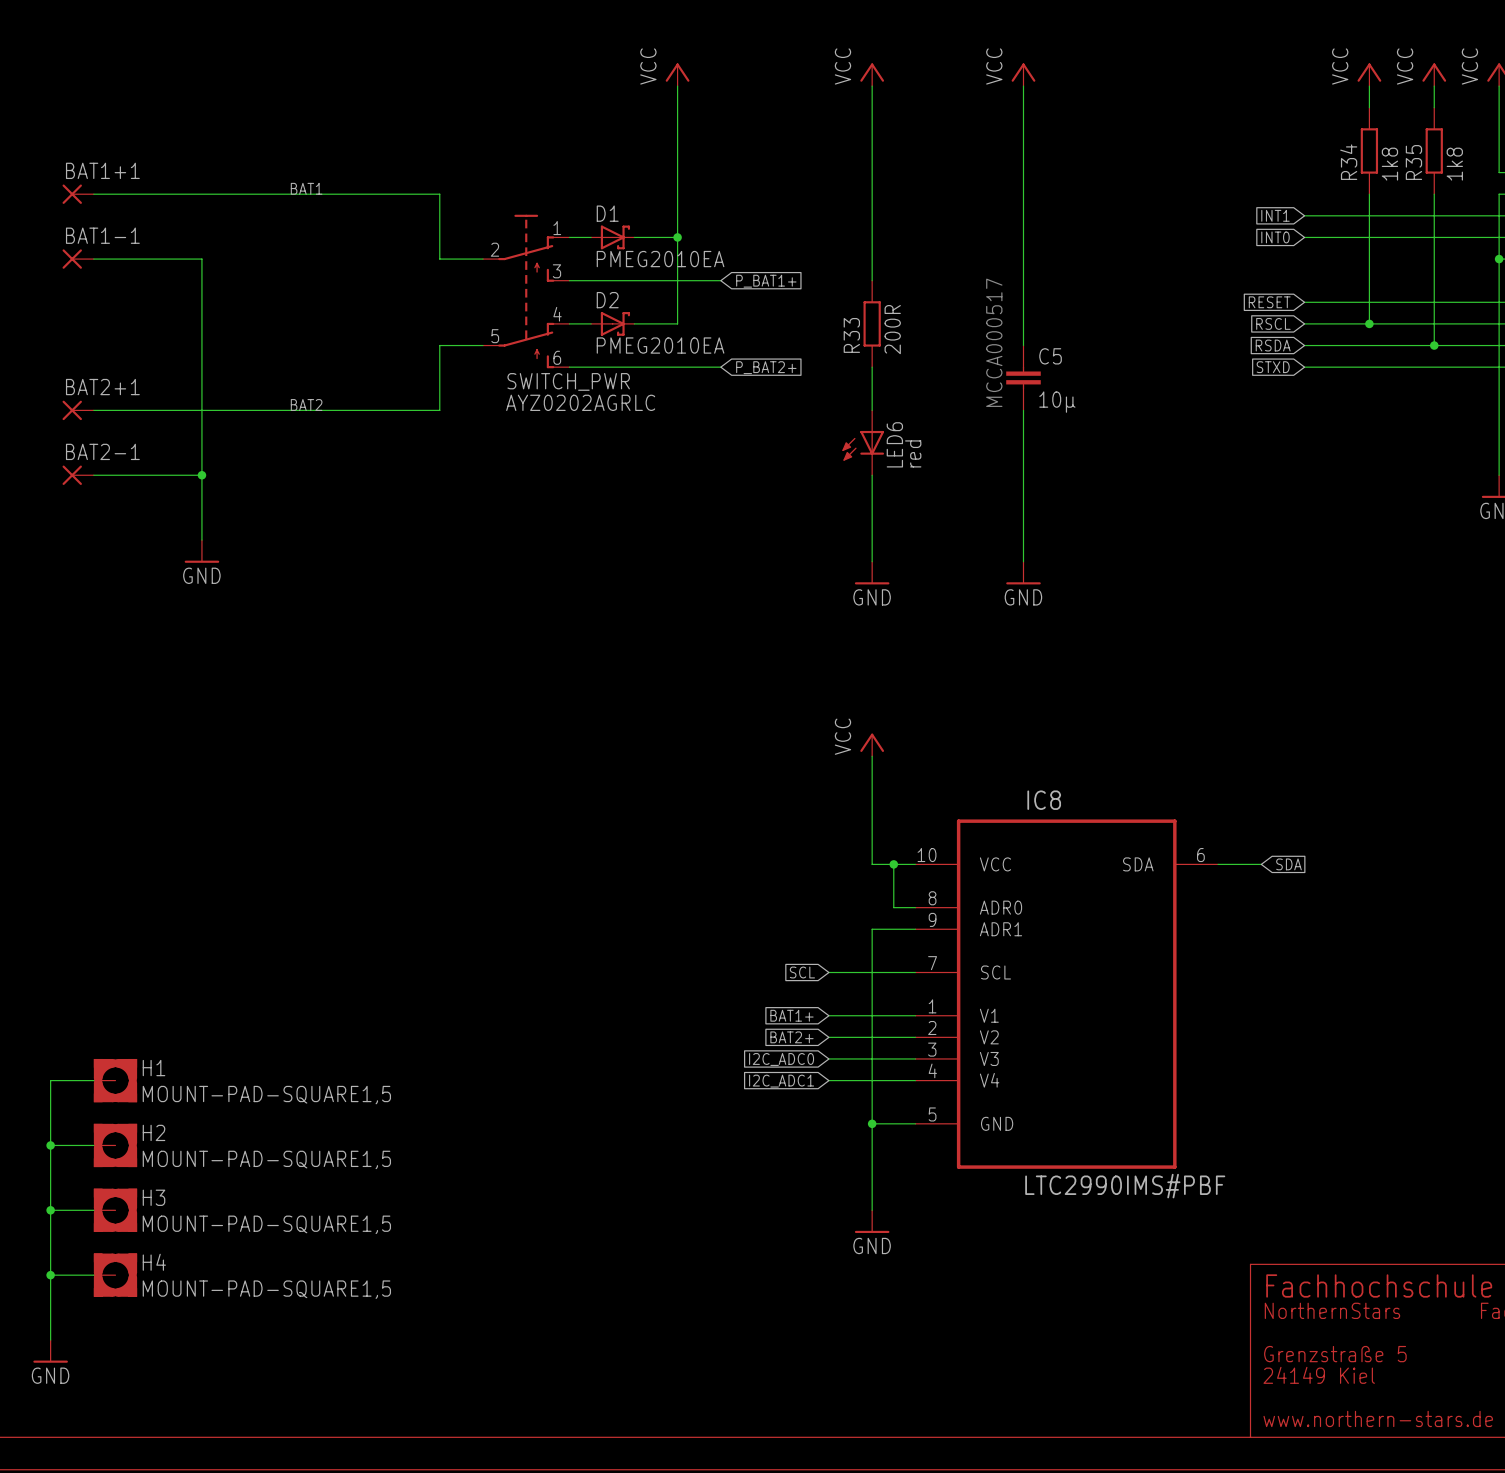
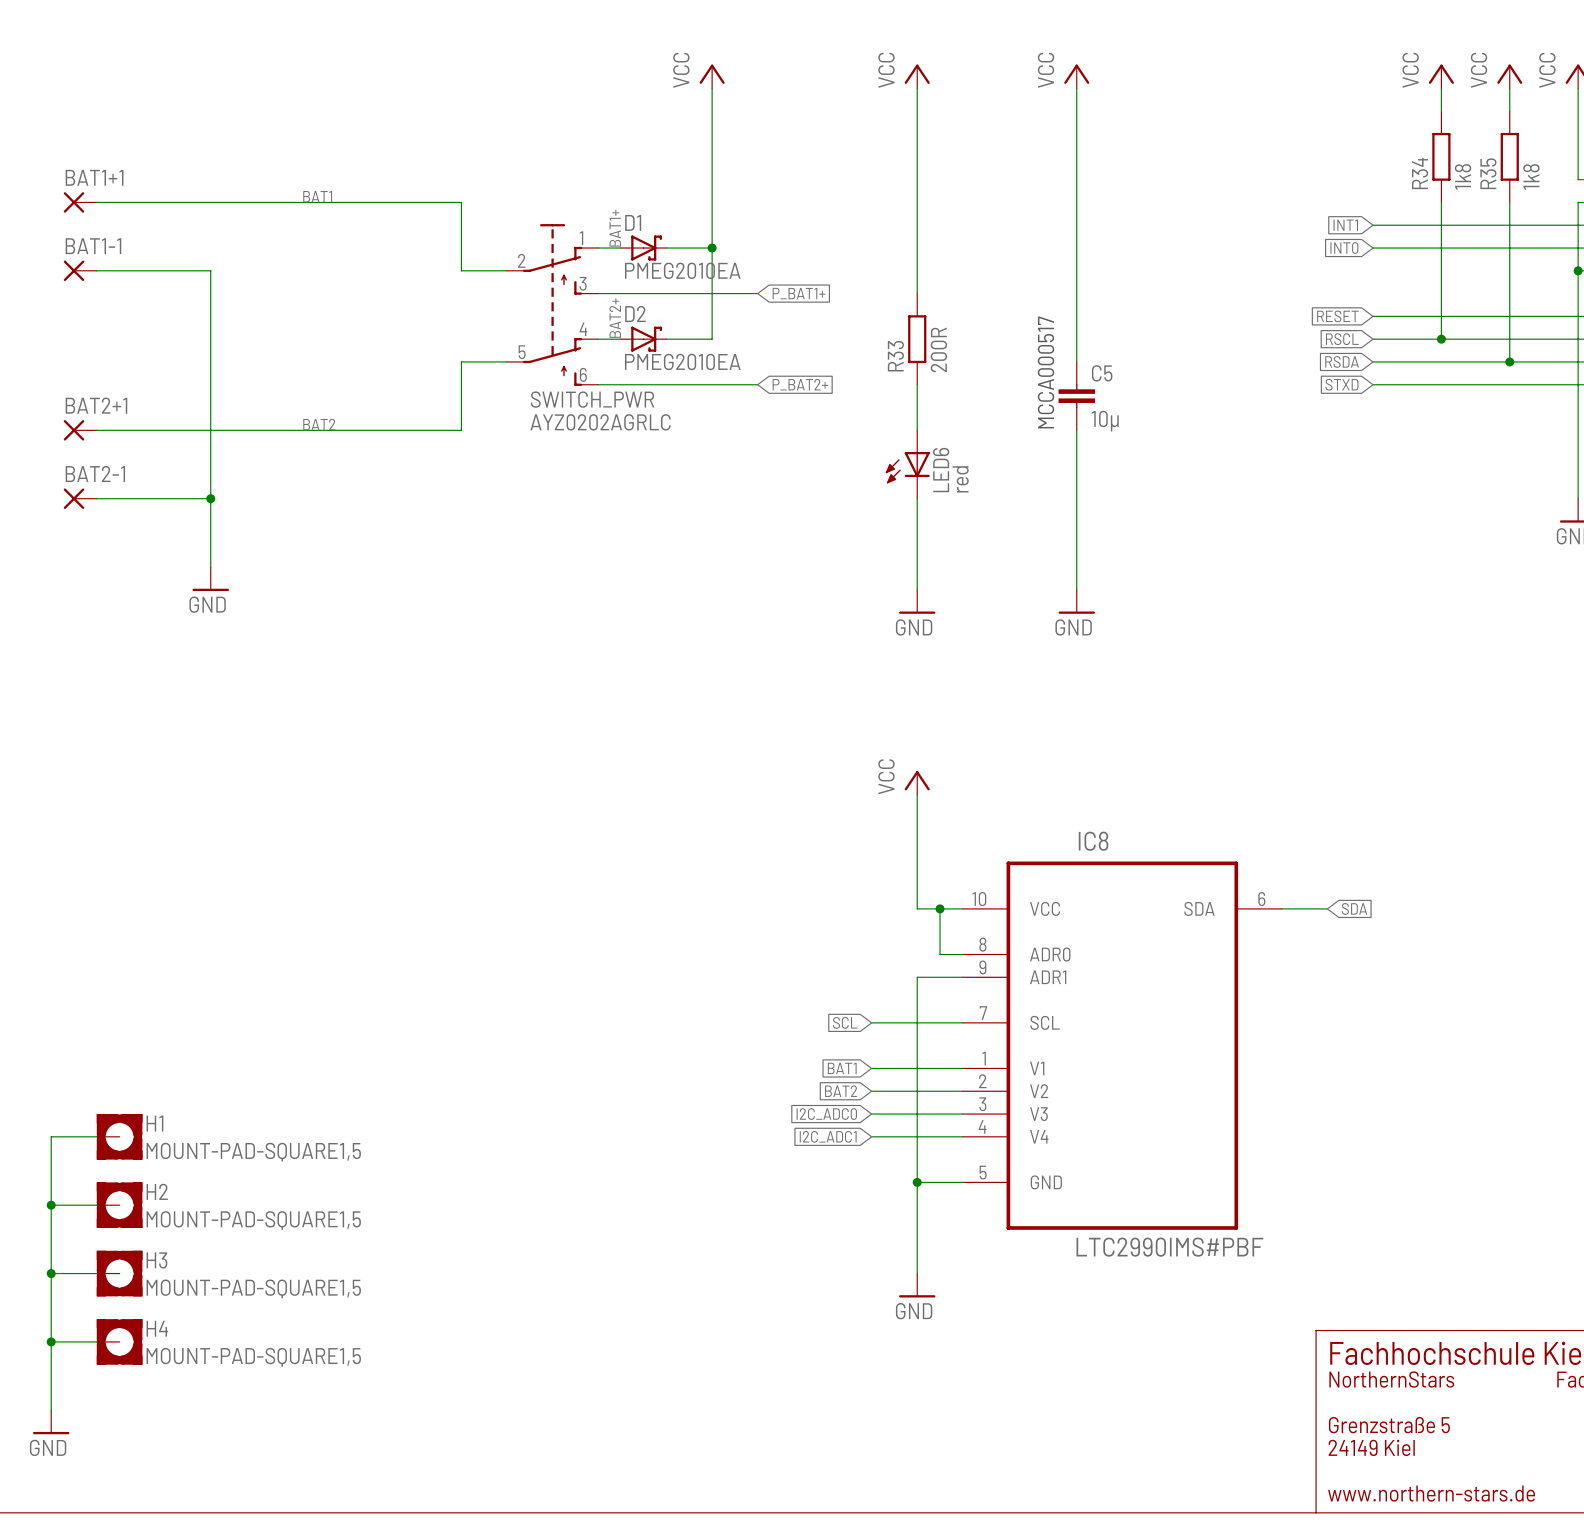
label: none -> BAT1+ (615, 228)
label: none -> BAT2+ (615, 317)
global label: BAT1+ (791, 1015) -> BAT1 (842, 1068)
global label: BAT2+ (791, 1037) -> BAT2 (841, 1091)

